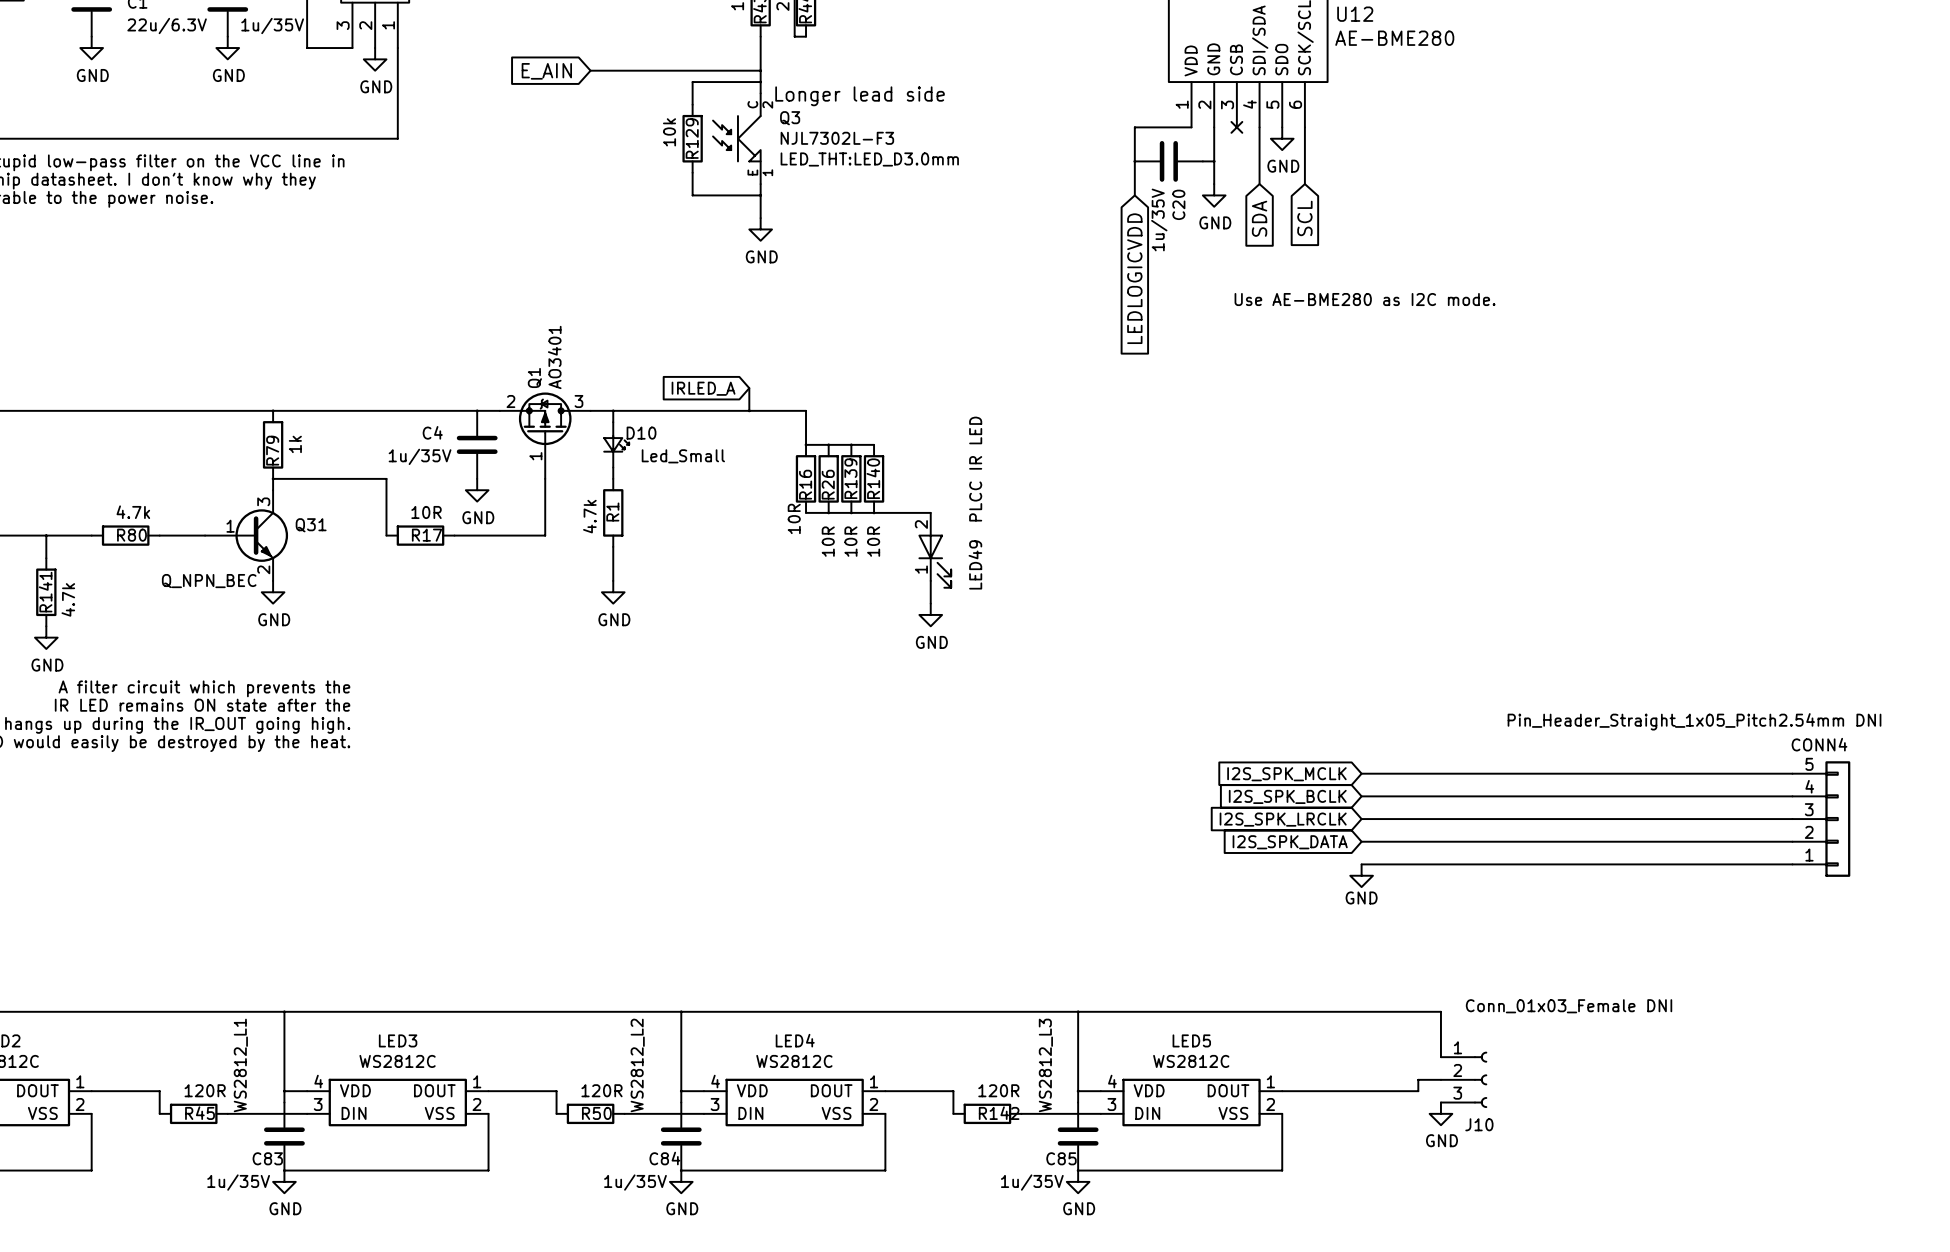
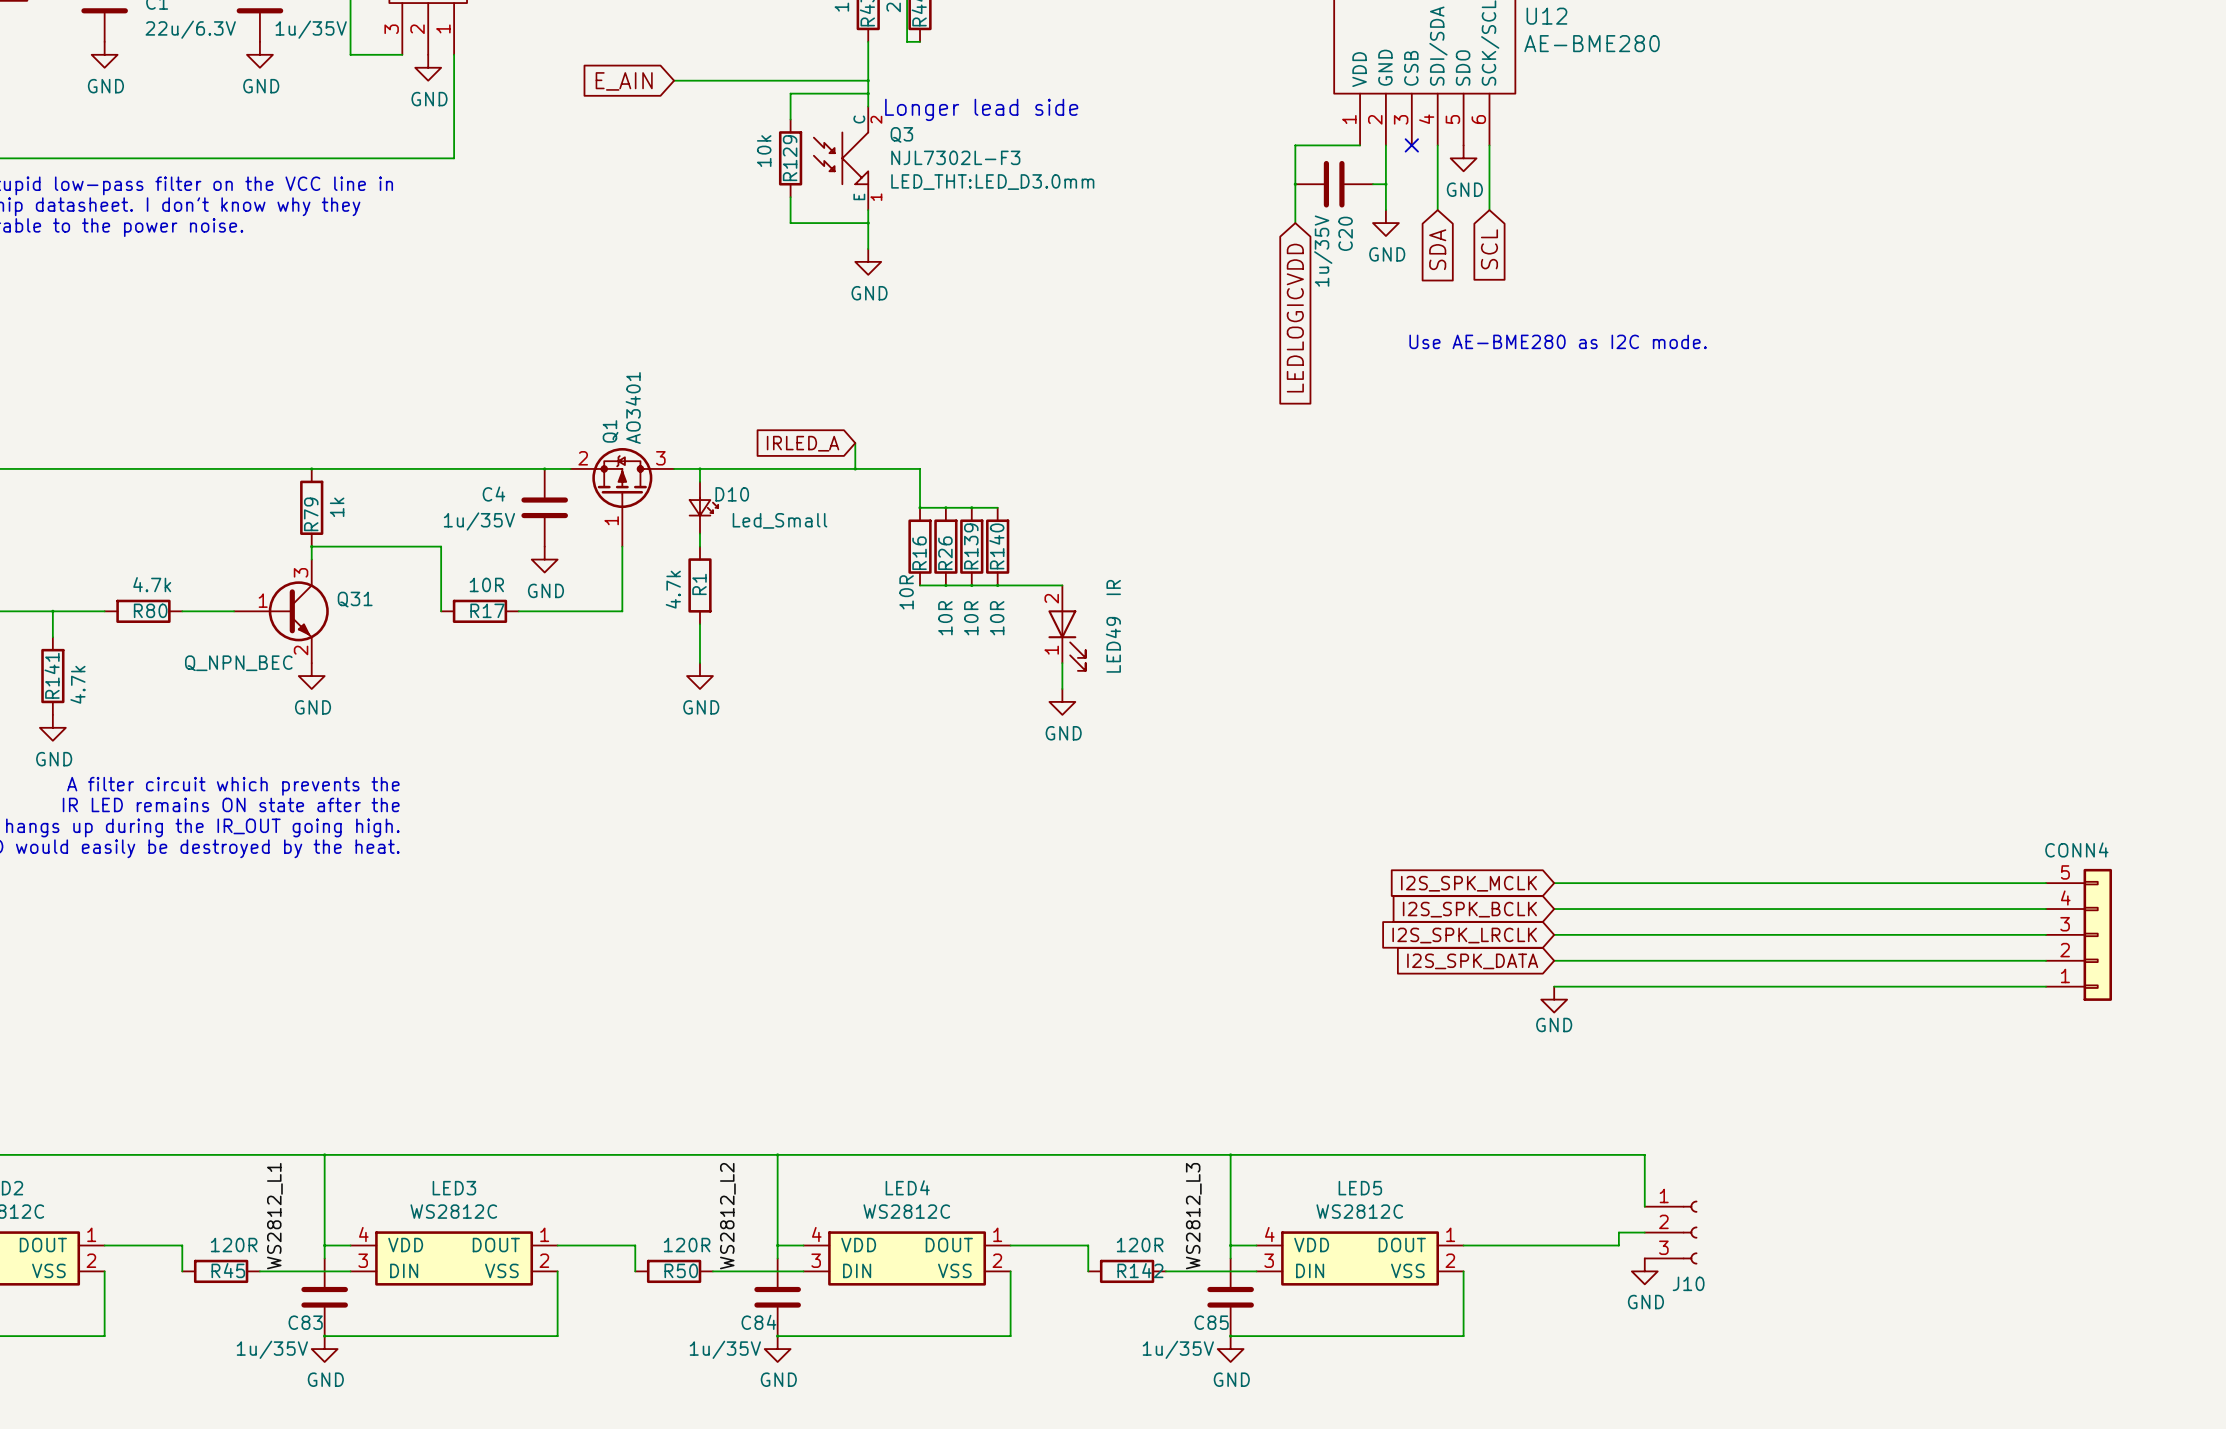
LED49 value: PLCC IR LED (975, 469) -> IR (1113, 587)
CONN4 value: Pin_Header_Straight_1x05_Pitch2.54mm DNI (1694, 721) -> none
J10 value: Conn_01x03_Female DNI (1569, 1006) -> none

